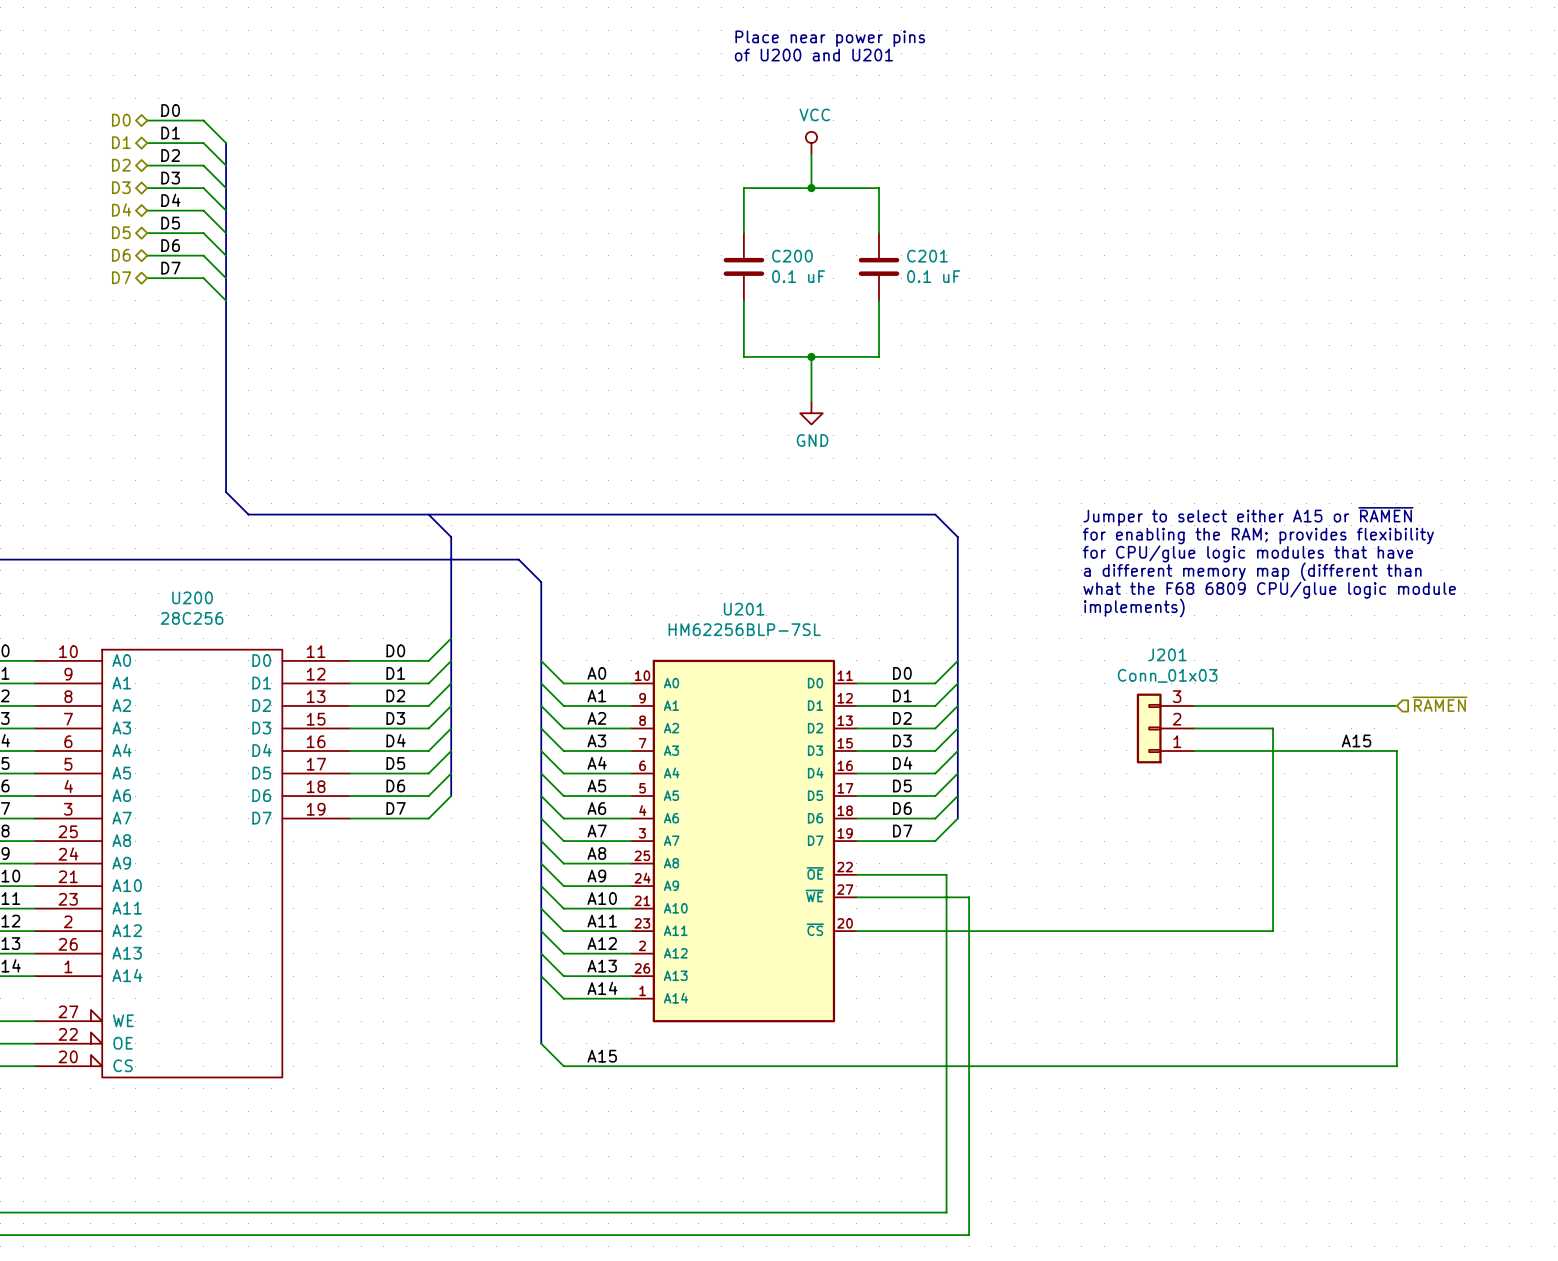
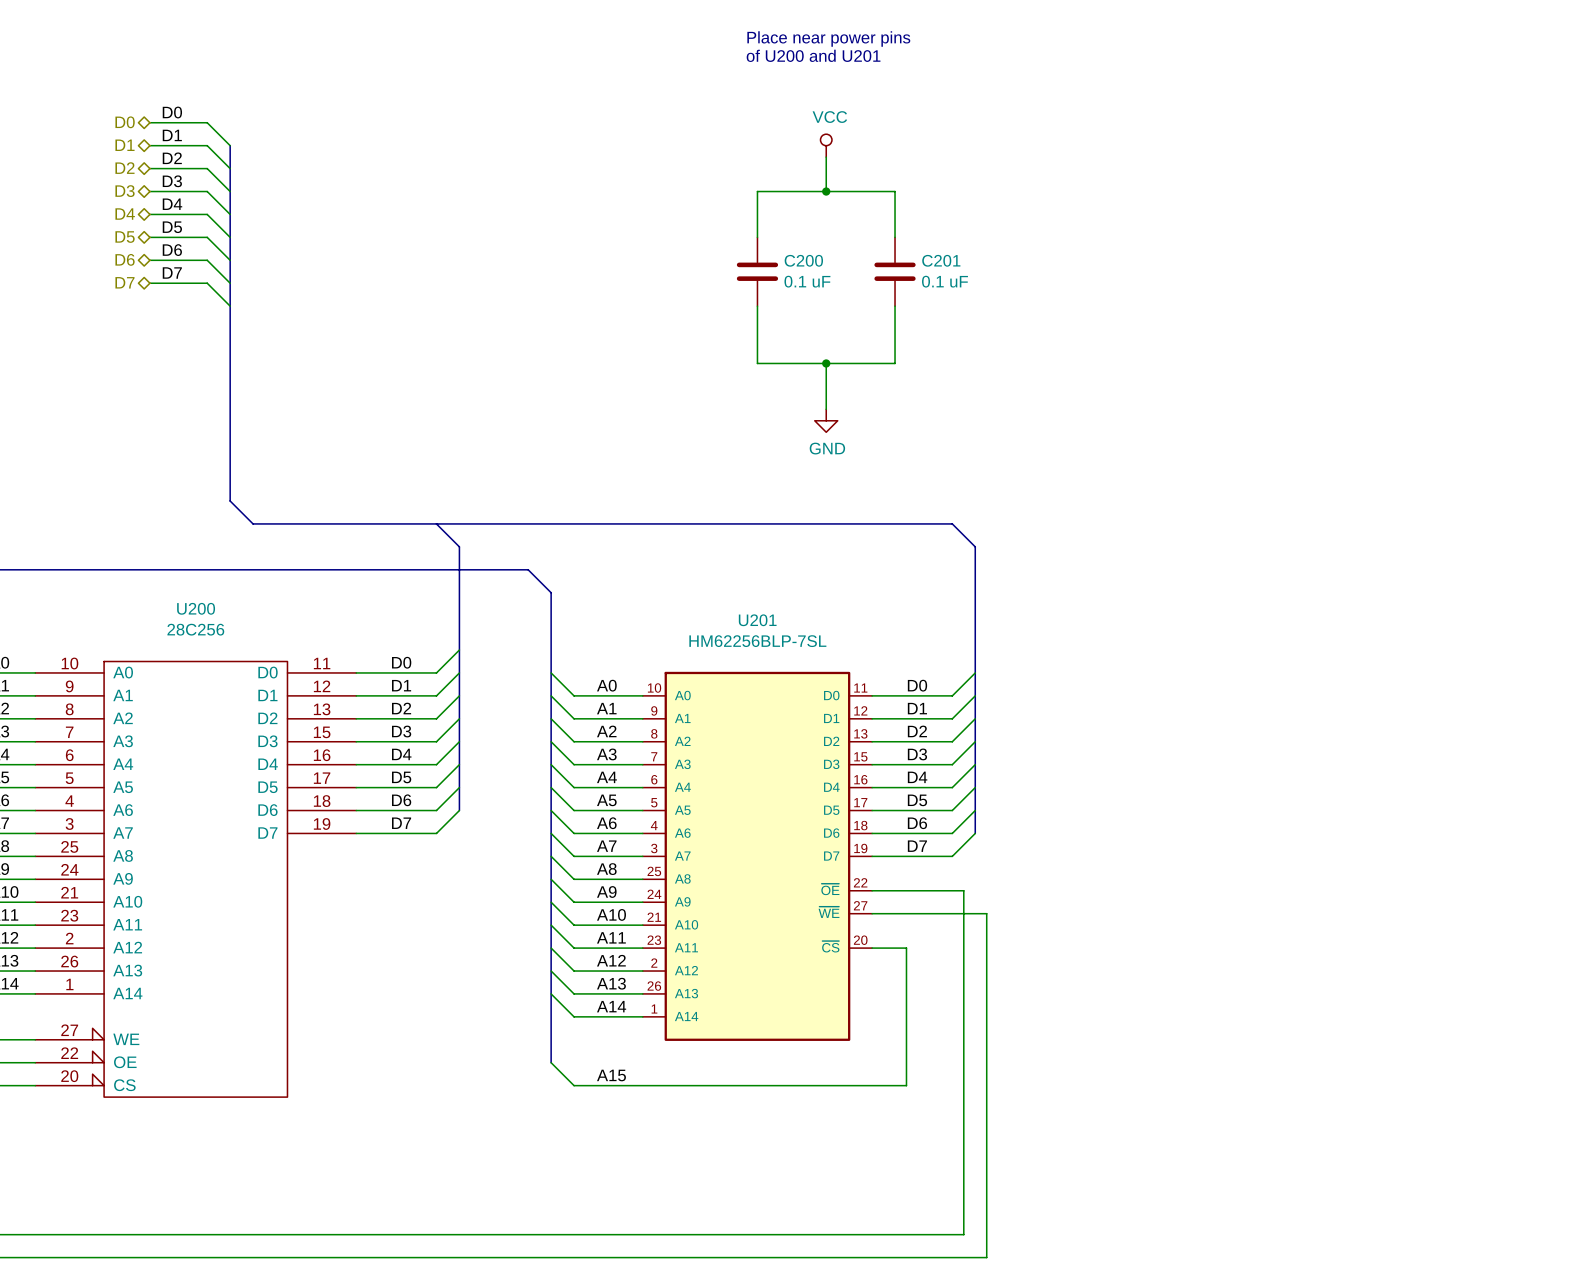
text: Jumper to select either A15 or ~{RAMEN} (1248, 516) -> none
text: for enabling the RAM; provides flexibility (1258, 536) -> none
text: for CPU/glue logic modules that have (1247, 553) -> none
text: a different memory map (different than (1252, 571) -> none
text: what the F68 6809 CPU/glue logic module (1269, 590) -> none
text: implements) (1134, 608) -> none
hierarchical label: ~{RAMEN} (1439, 704) -> none
wire: (1194, 705) (1396, 705) -> none
J201: Conn_01x03 (1165, 728) -> none
wire: (1194, 728) (1273, 728) (1273, 931) (890, 931) -> none
label: A15 (1356, 740) -> none
wire: (1194, 750) (1396, 750) (1396, 1066) (890, 1066) -> (906, 948) (906, 1085)

